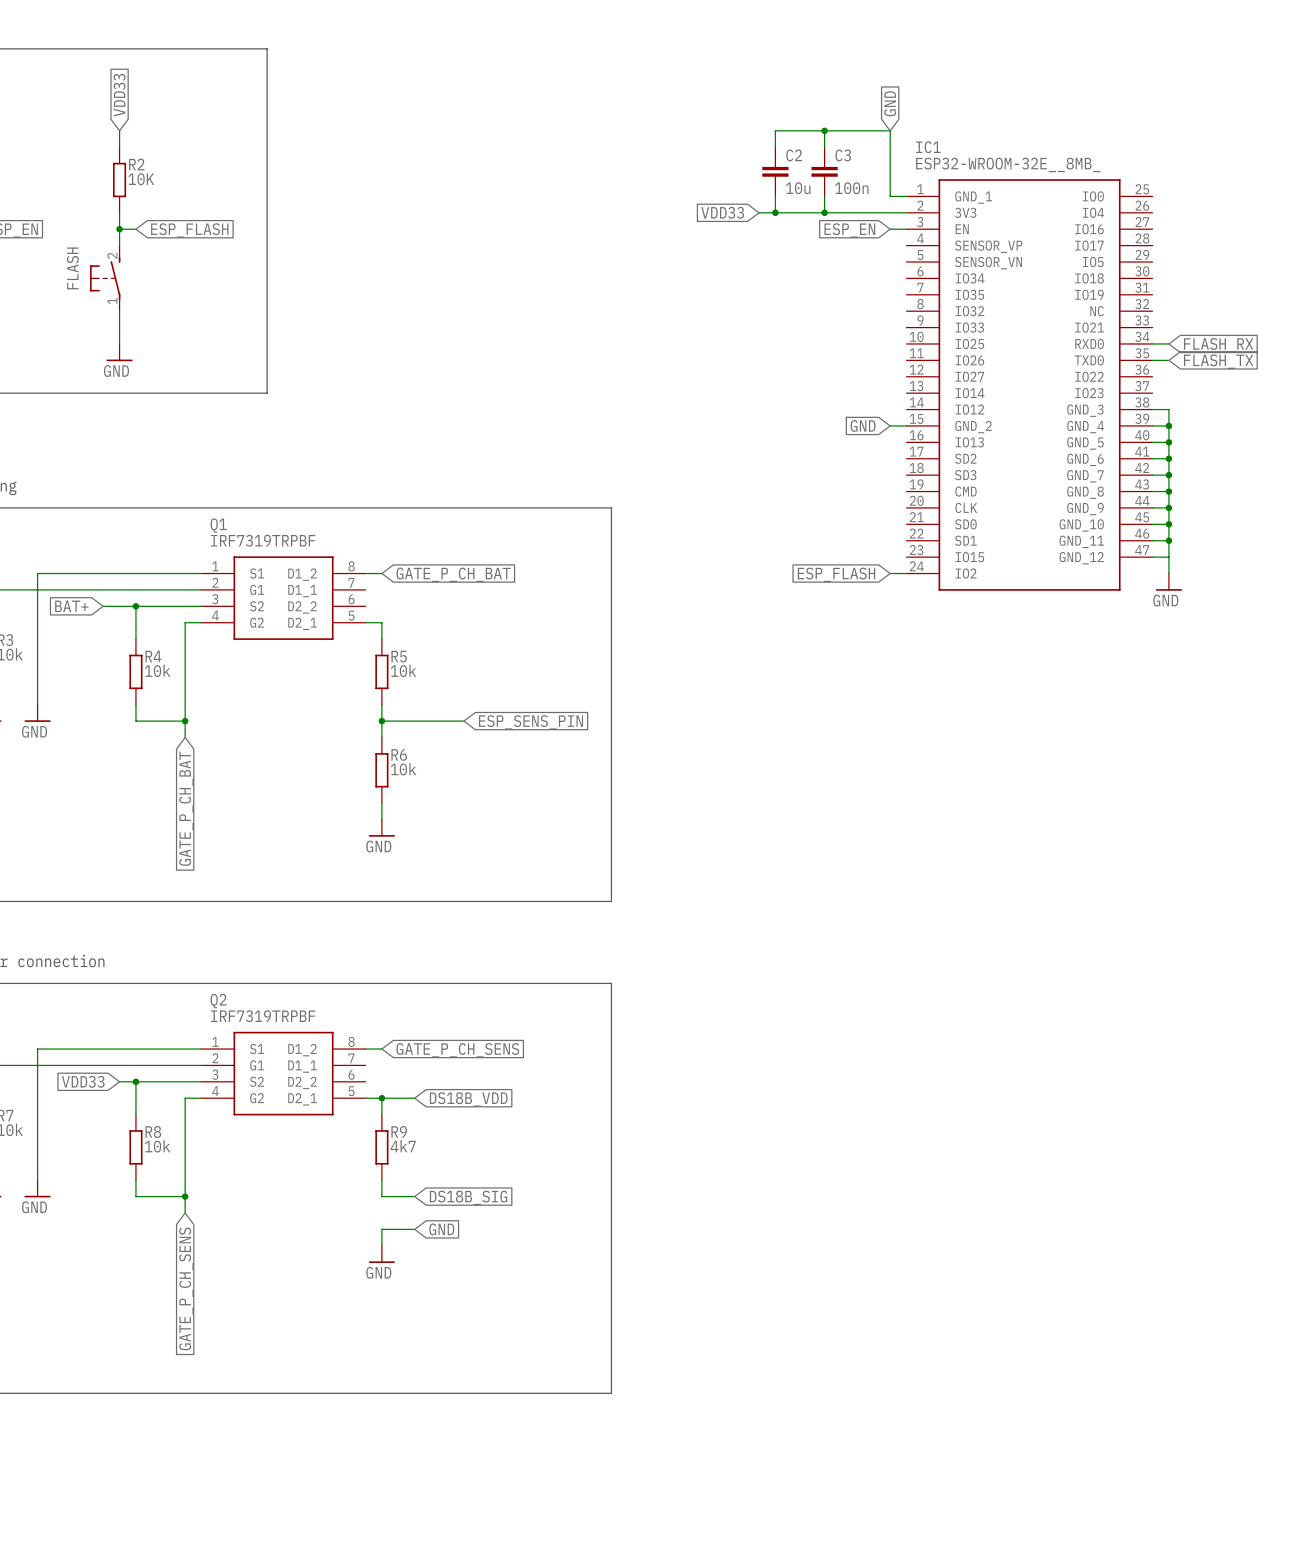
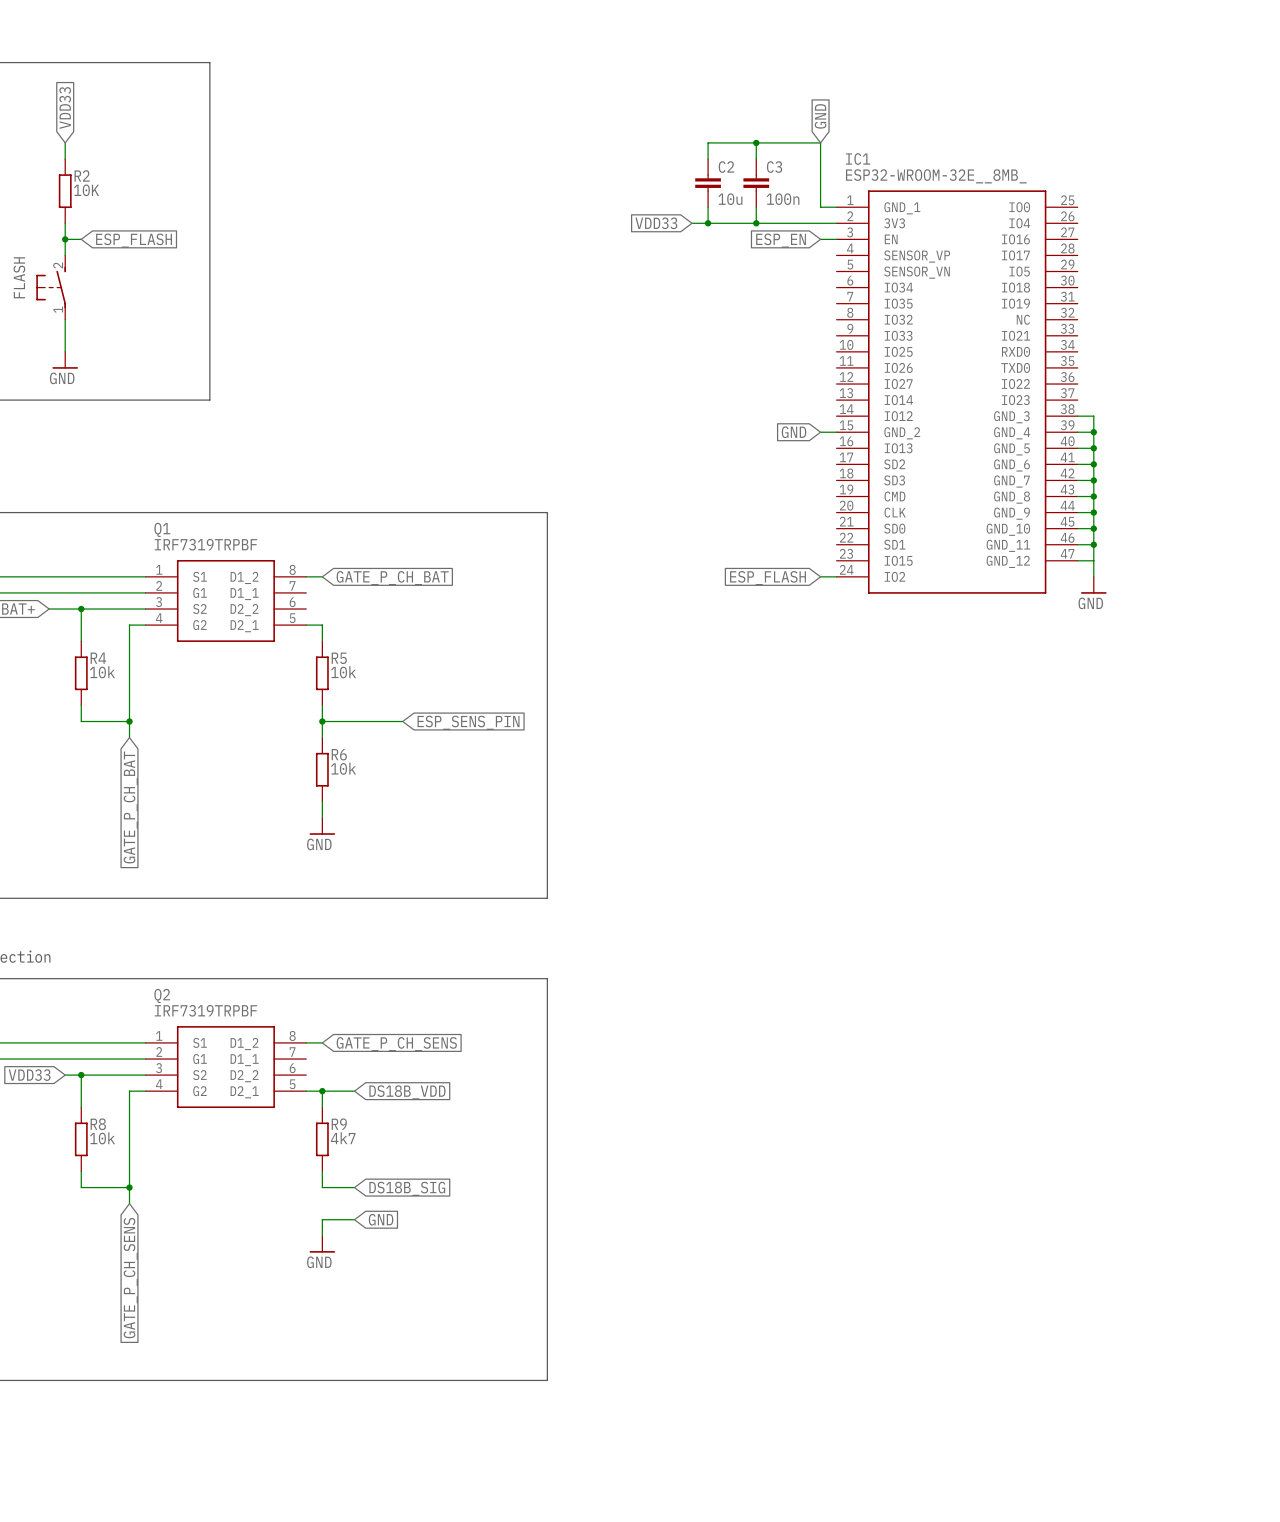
wire: (1152, 343) (1168, 343) -> none
global label: FLASH_RX (1218, 345) -> none
wire: (1152, 360) (1168, 360) -> none
global label: FLASH_TX (1218, 361) -> none

